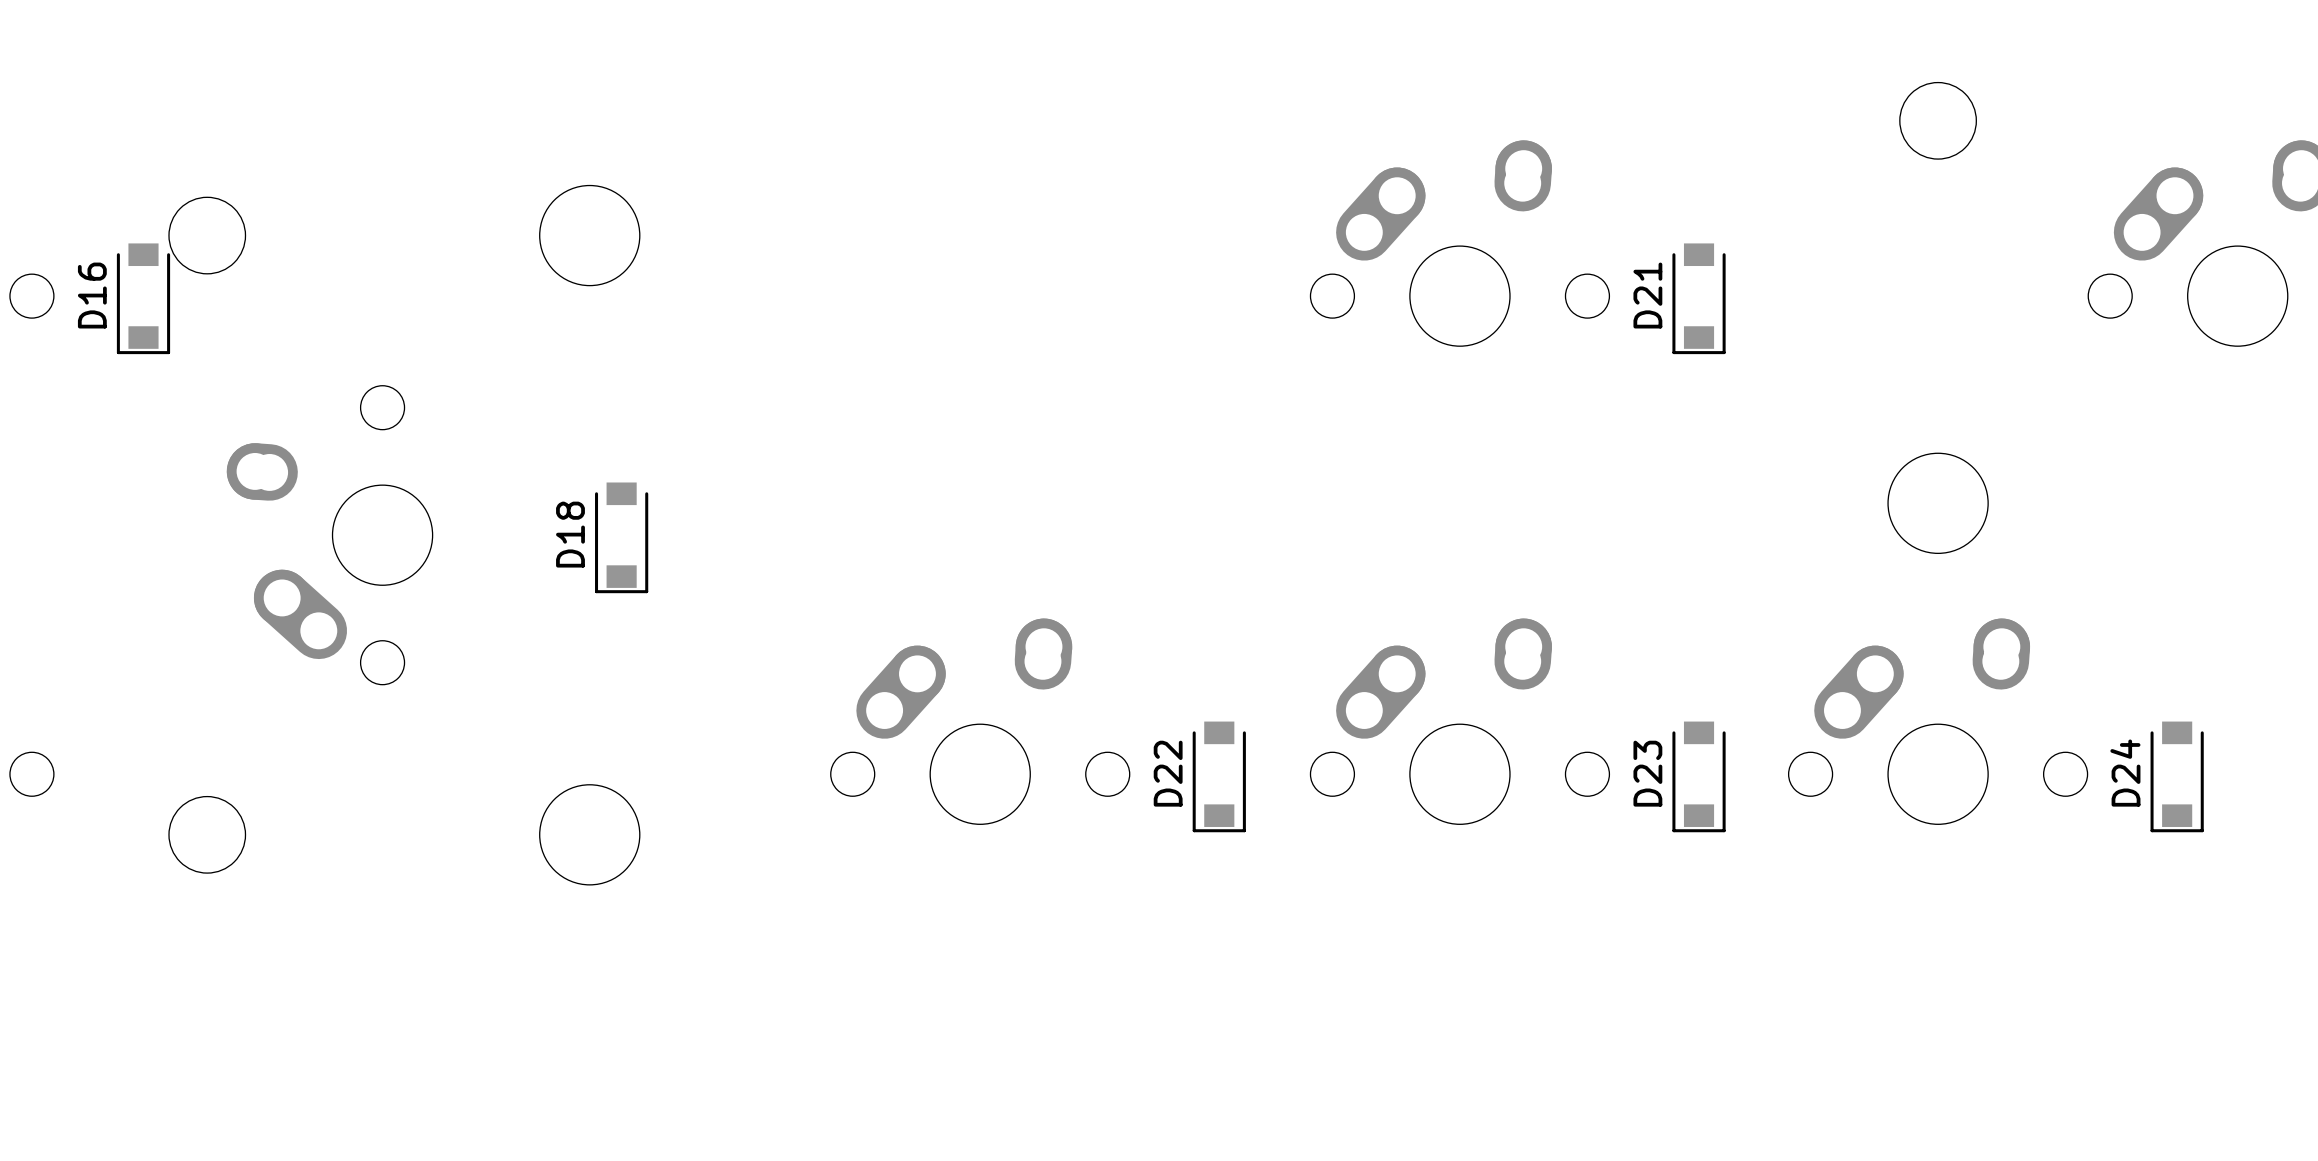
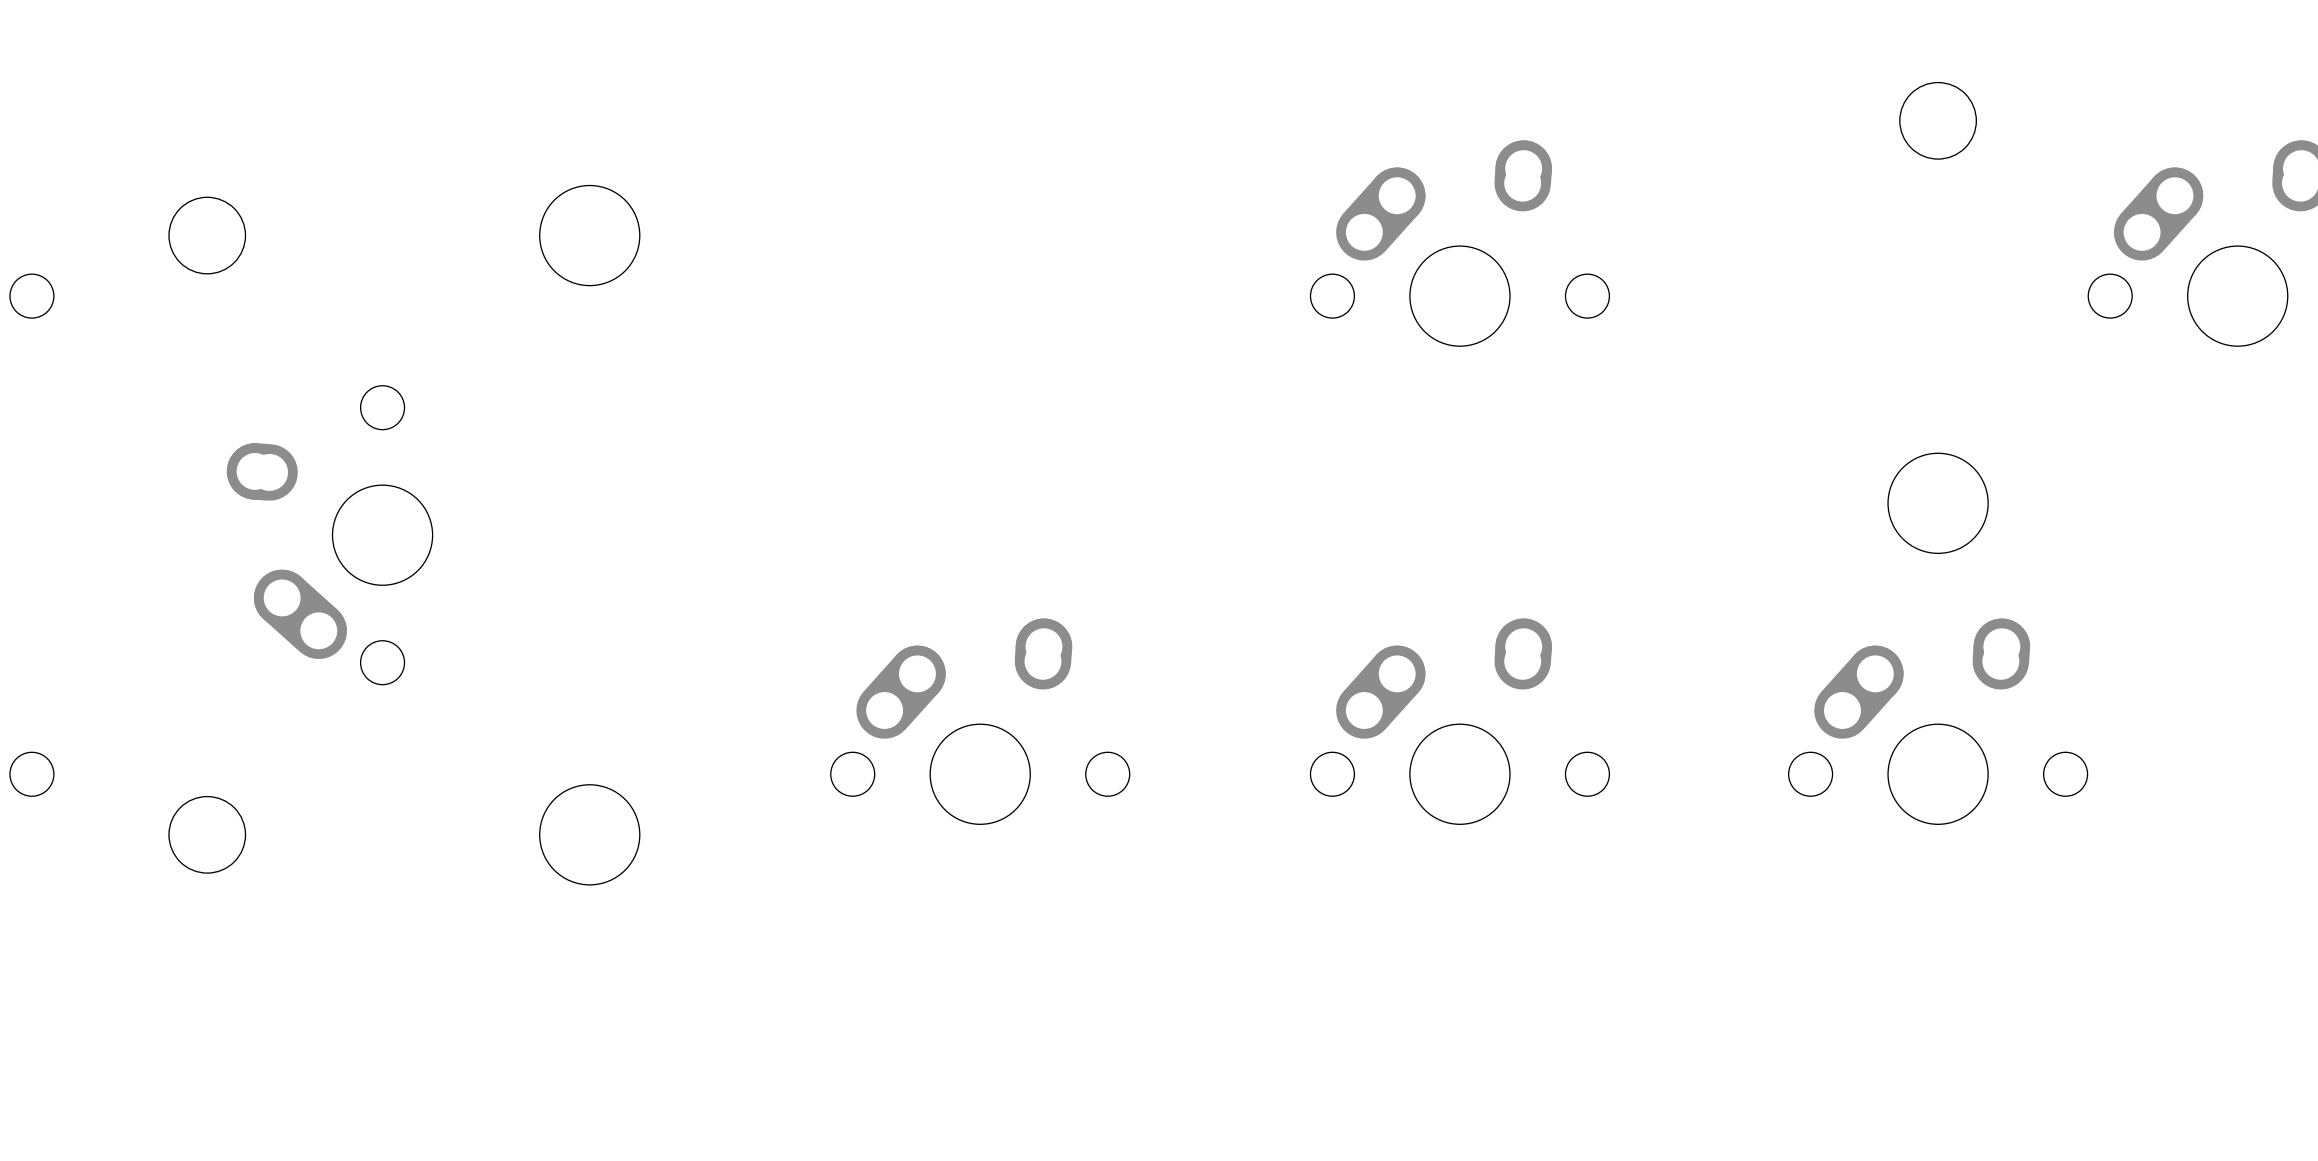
D16: (143, 298) -> none
D21: (1699, 298) -> none
D18: (621, 537) -> none
D22: (1219, 776) -> none
D23: (1699, 776) -> none
D24: (2177, 776) -> none

